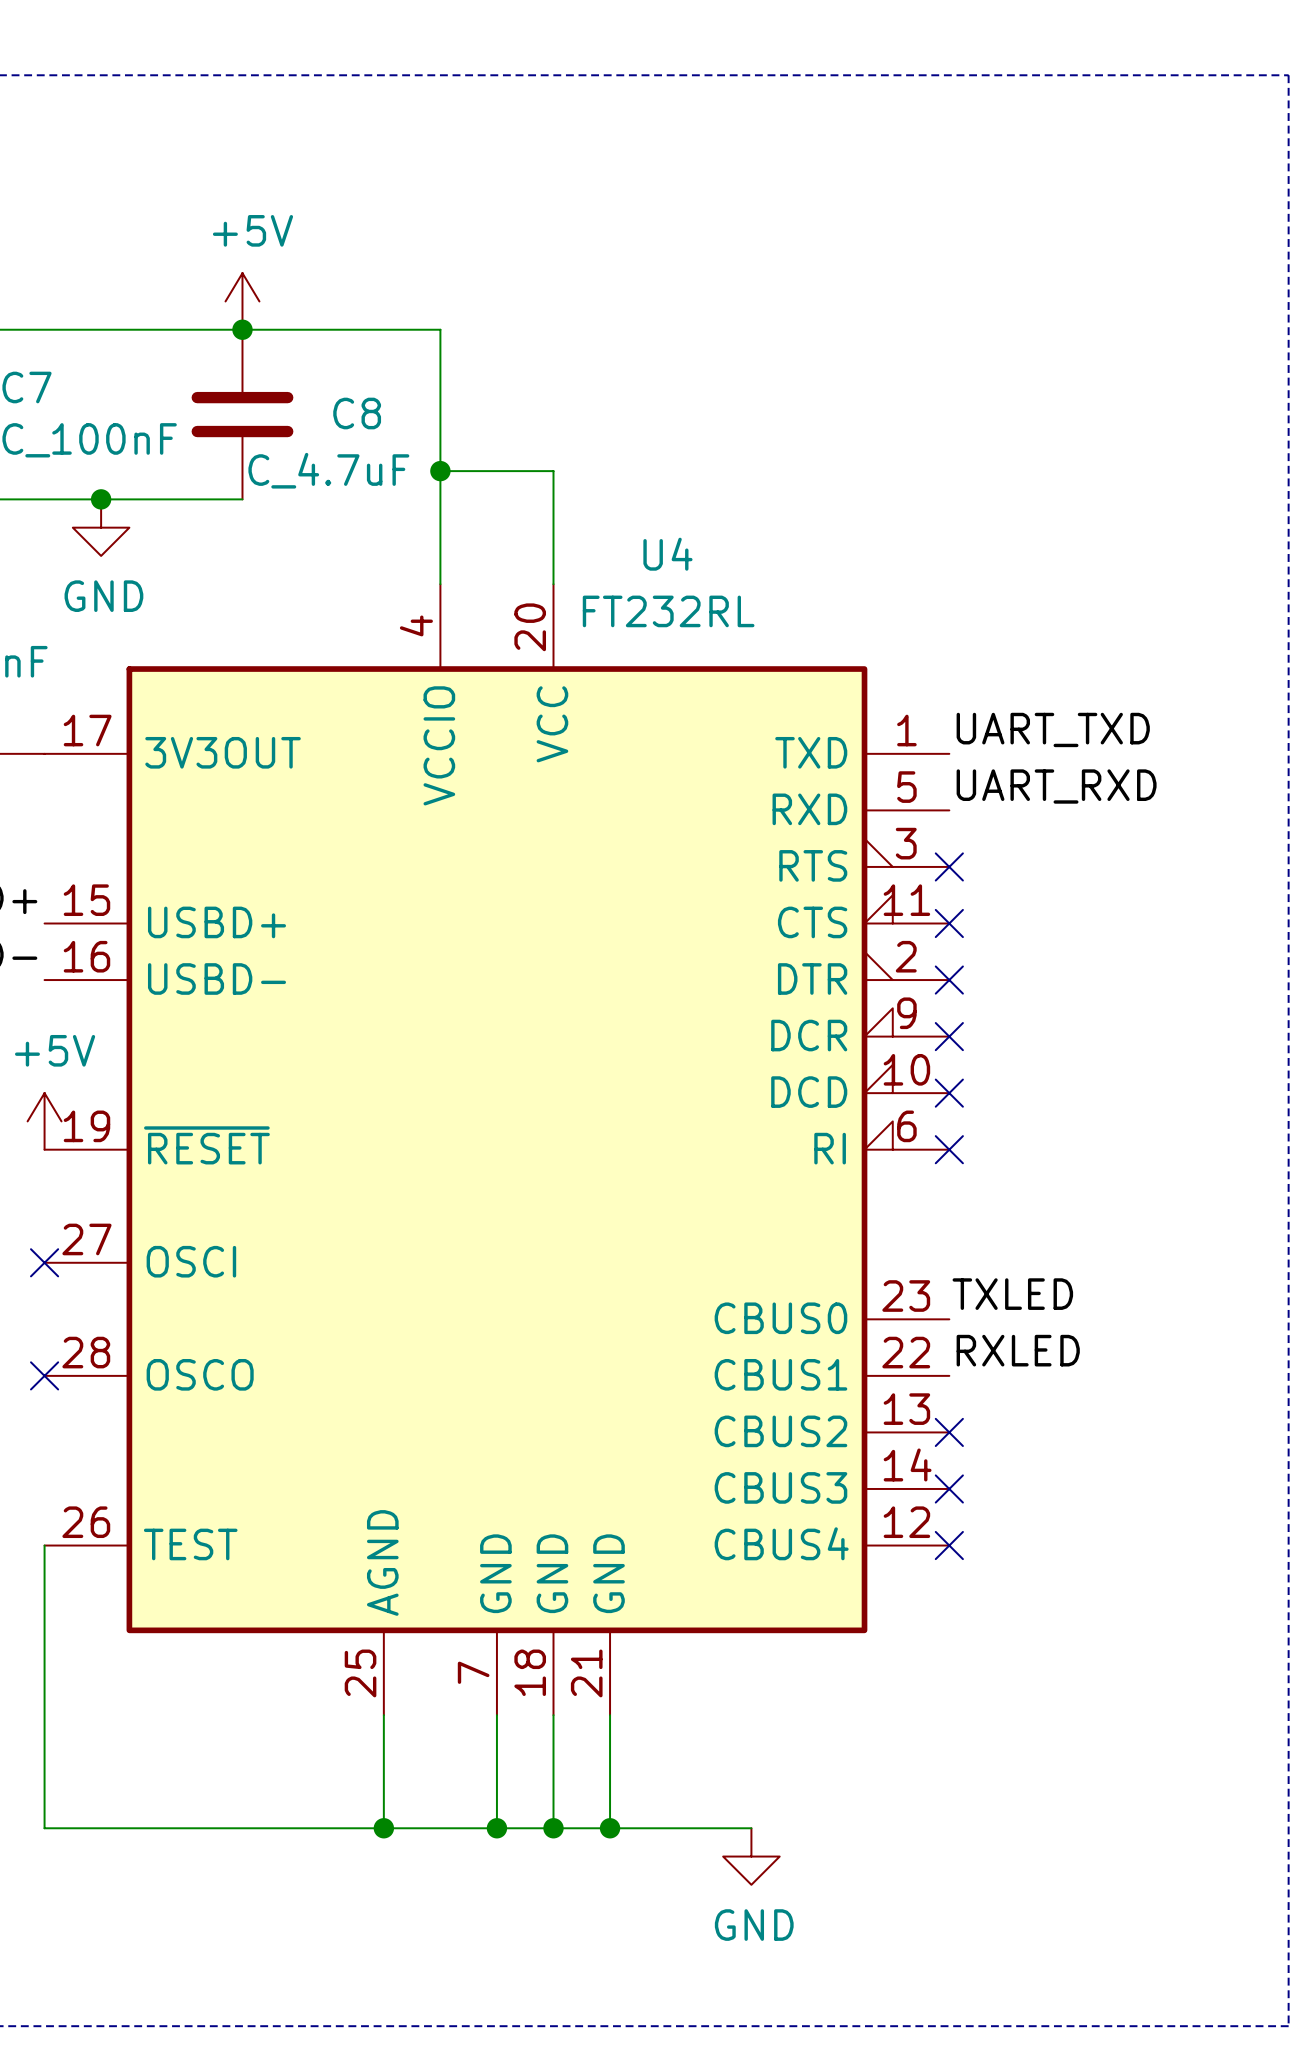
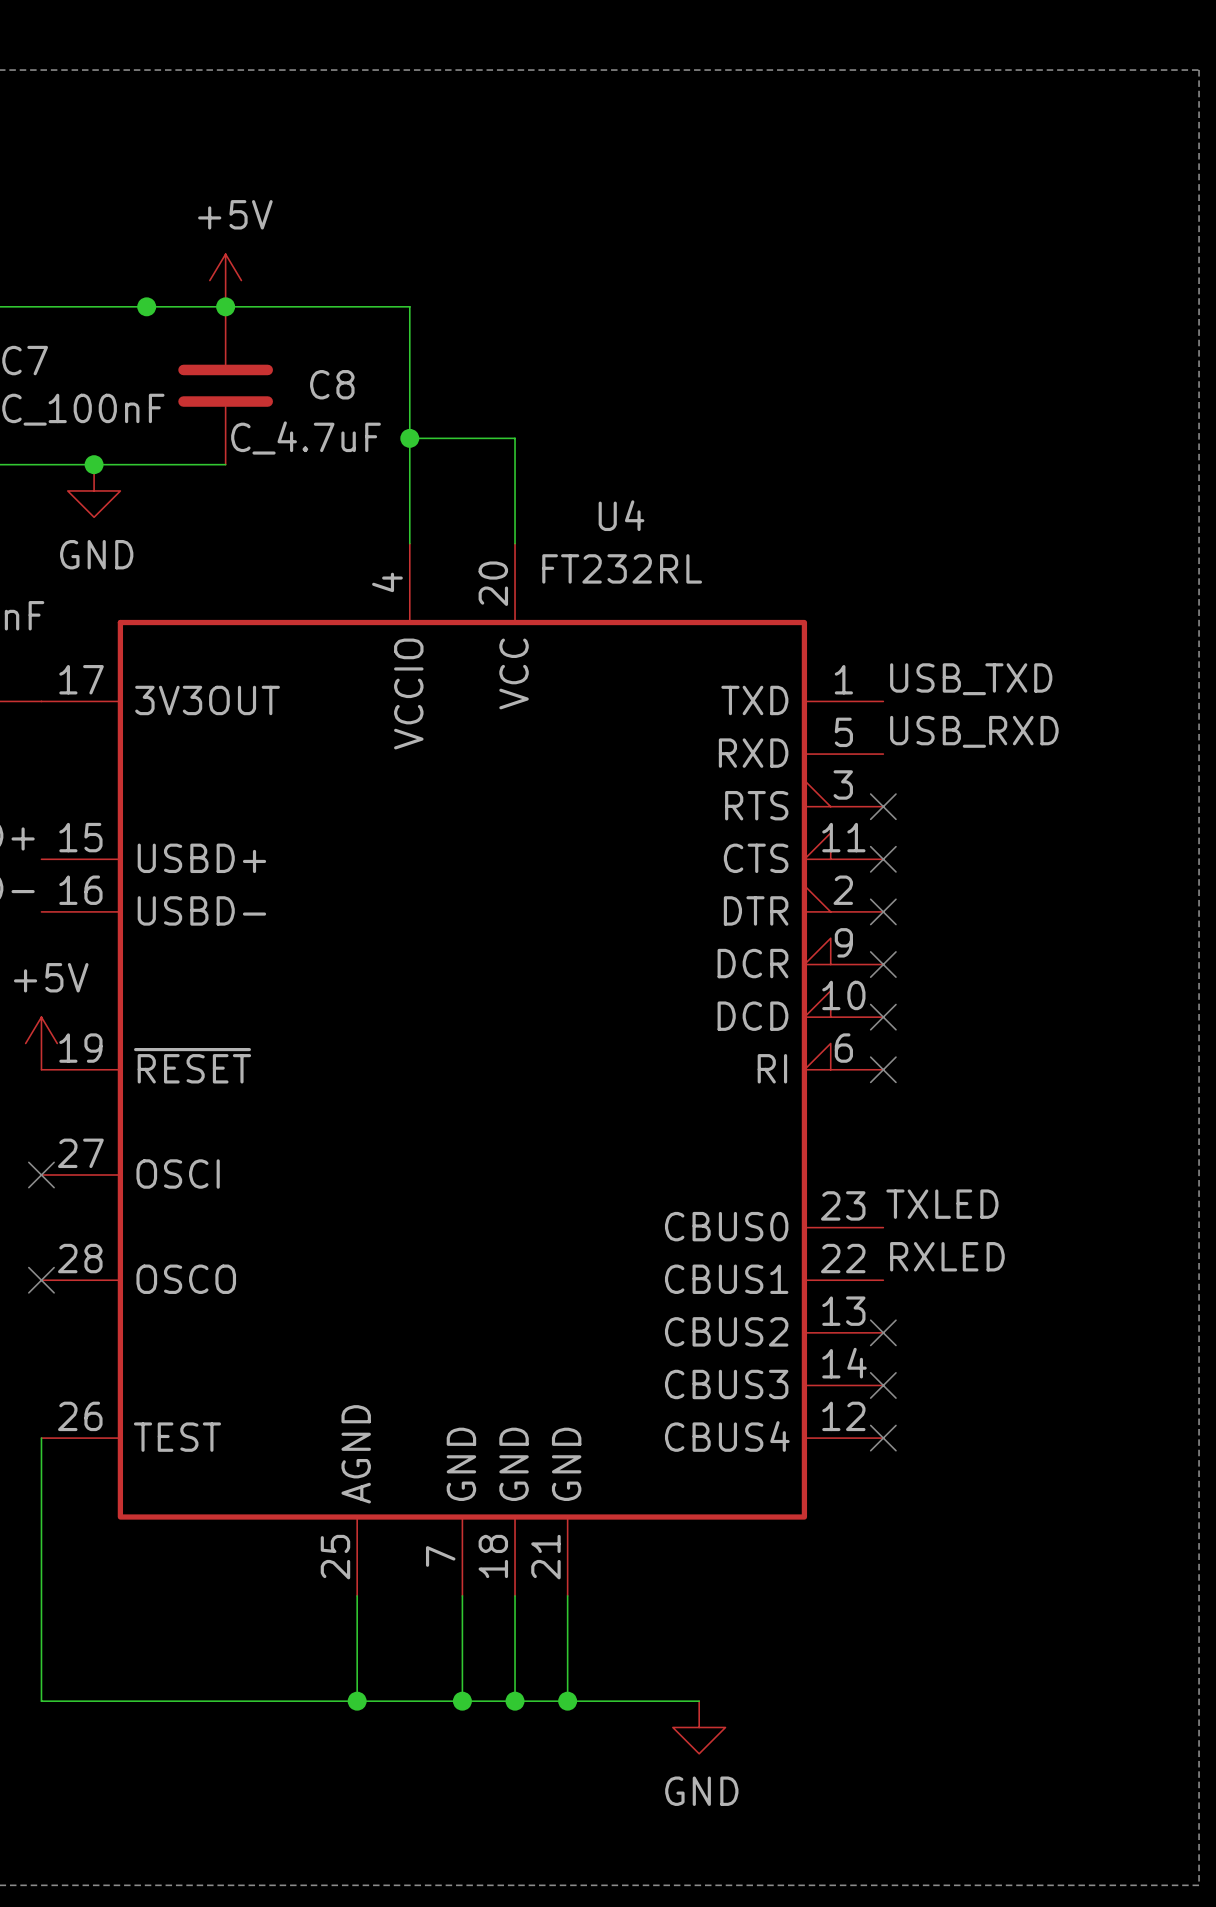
junction: none -> (146, 306)
label: UART_TXD (1053, 729) -> USB_TXD (971, 679)
label: UART_RXD (1056, 786) -> USB_RXD (974, 731)

